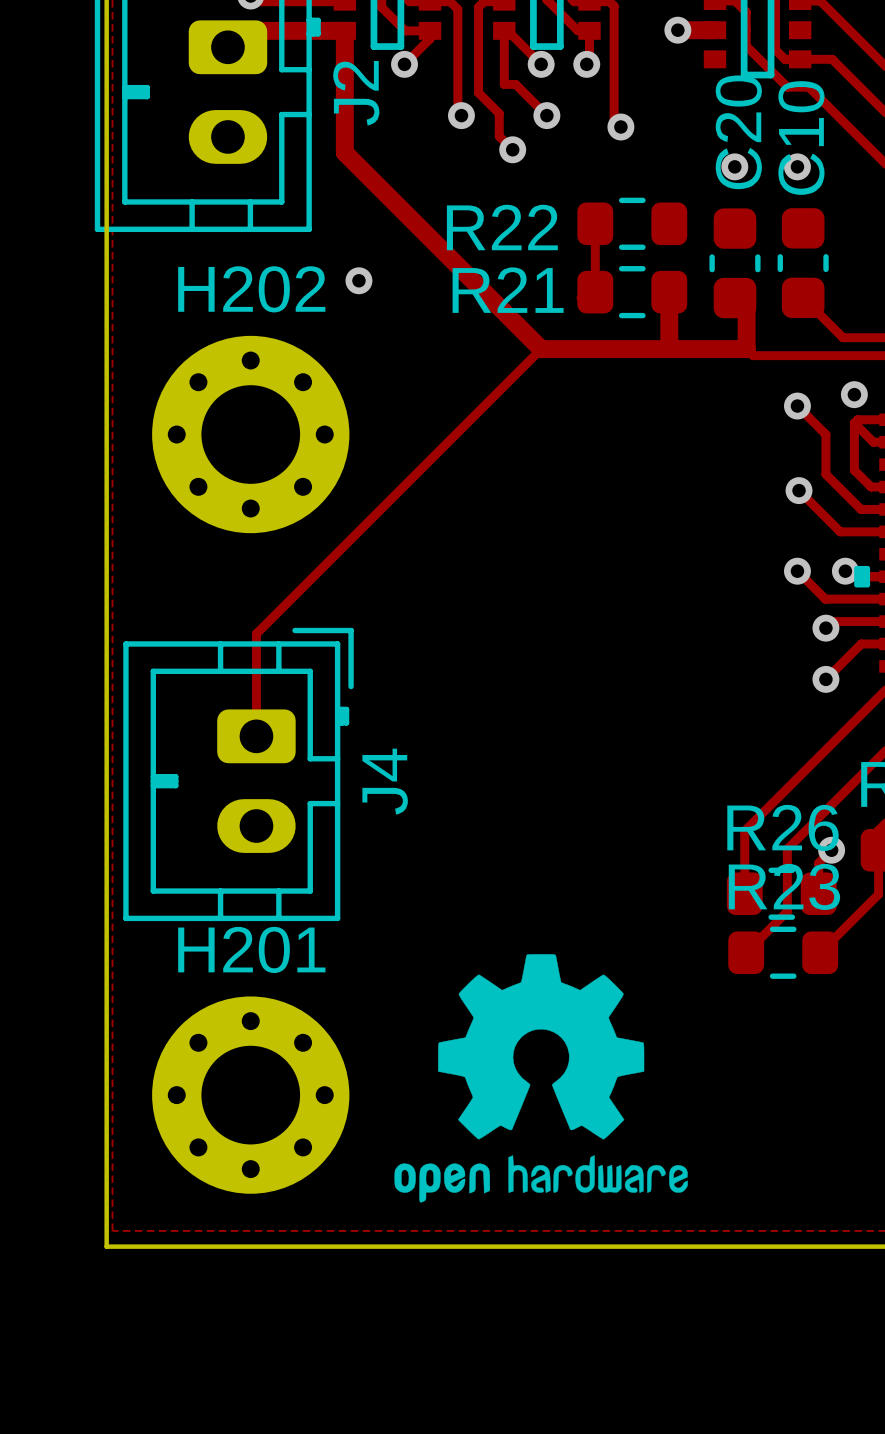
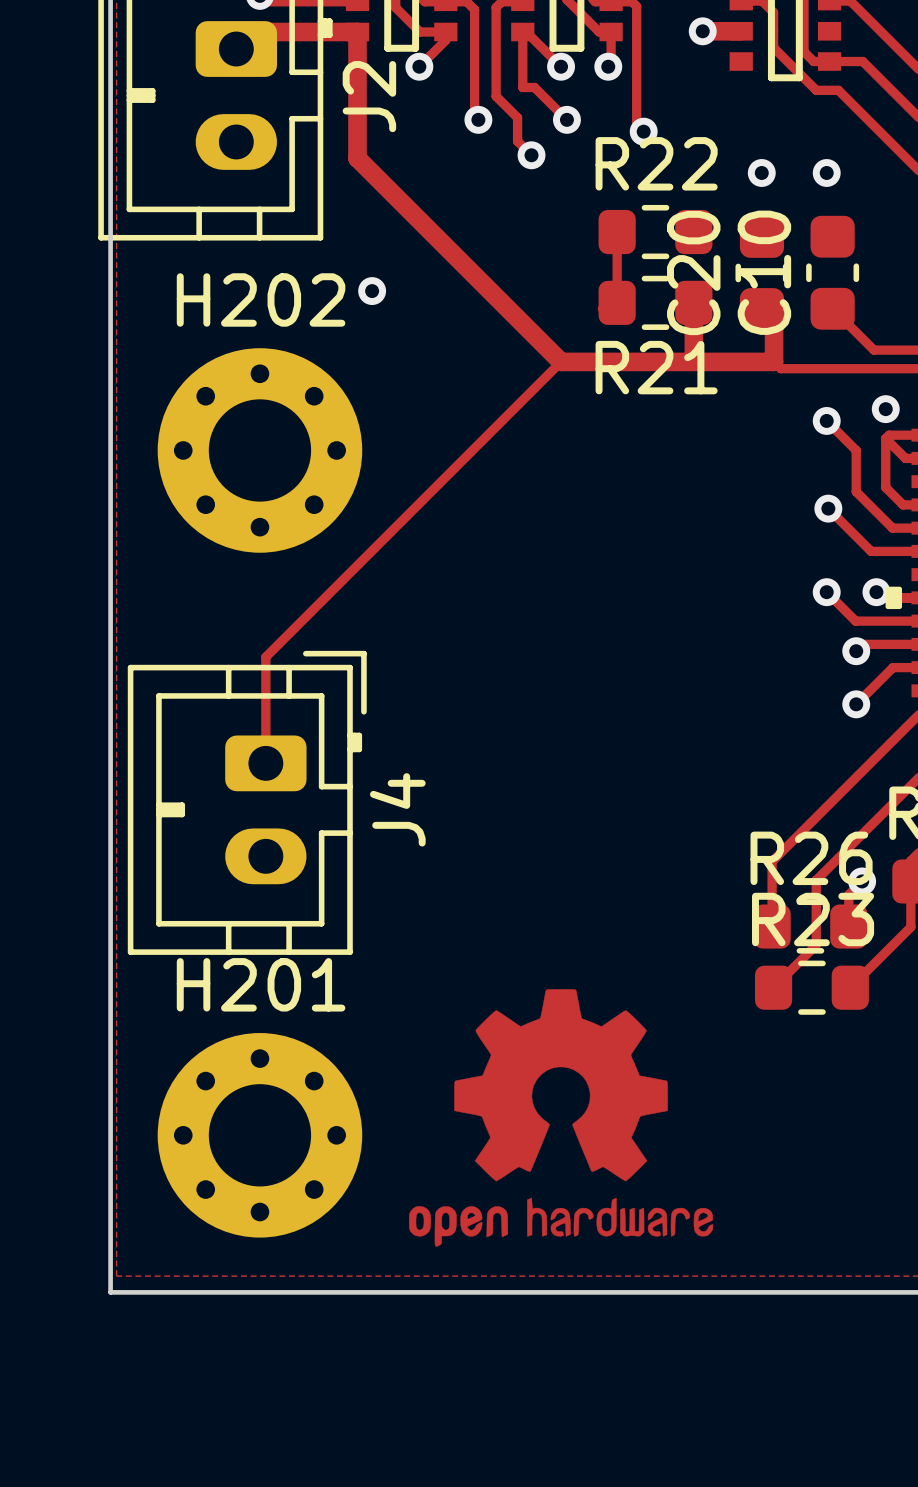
C20 name position: C20 (738, 132) -> C20 (693, 272)
C10 name position: C10 (801, 138) -> C10 (764, 272)
R22 name position: R22 (502, 227) -> R22 (656, 163)
R21 name position: R21 (508, 290) -> R21 (656, 367)
drawing shape: [394, 954, 688, 1203] -> [409, 989, 714, 1247]

